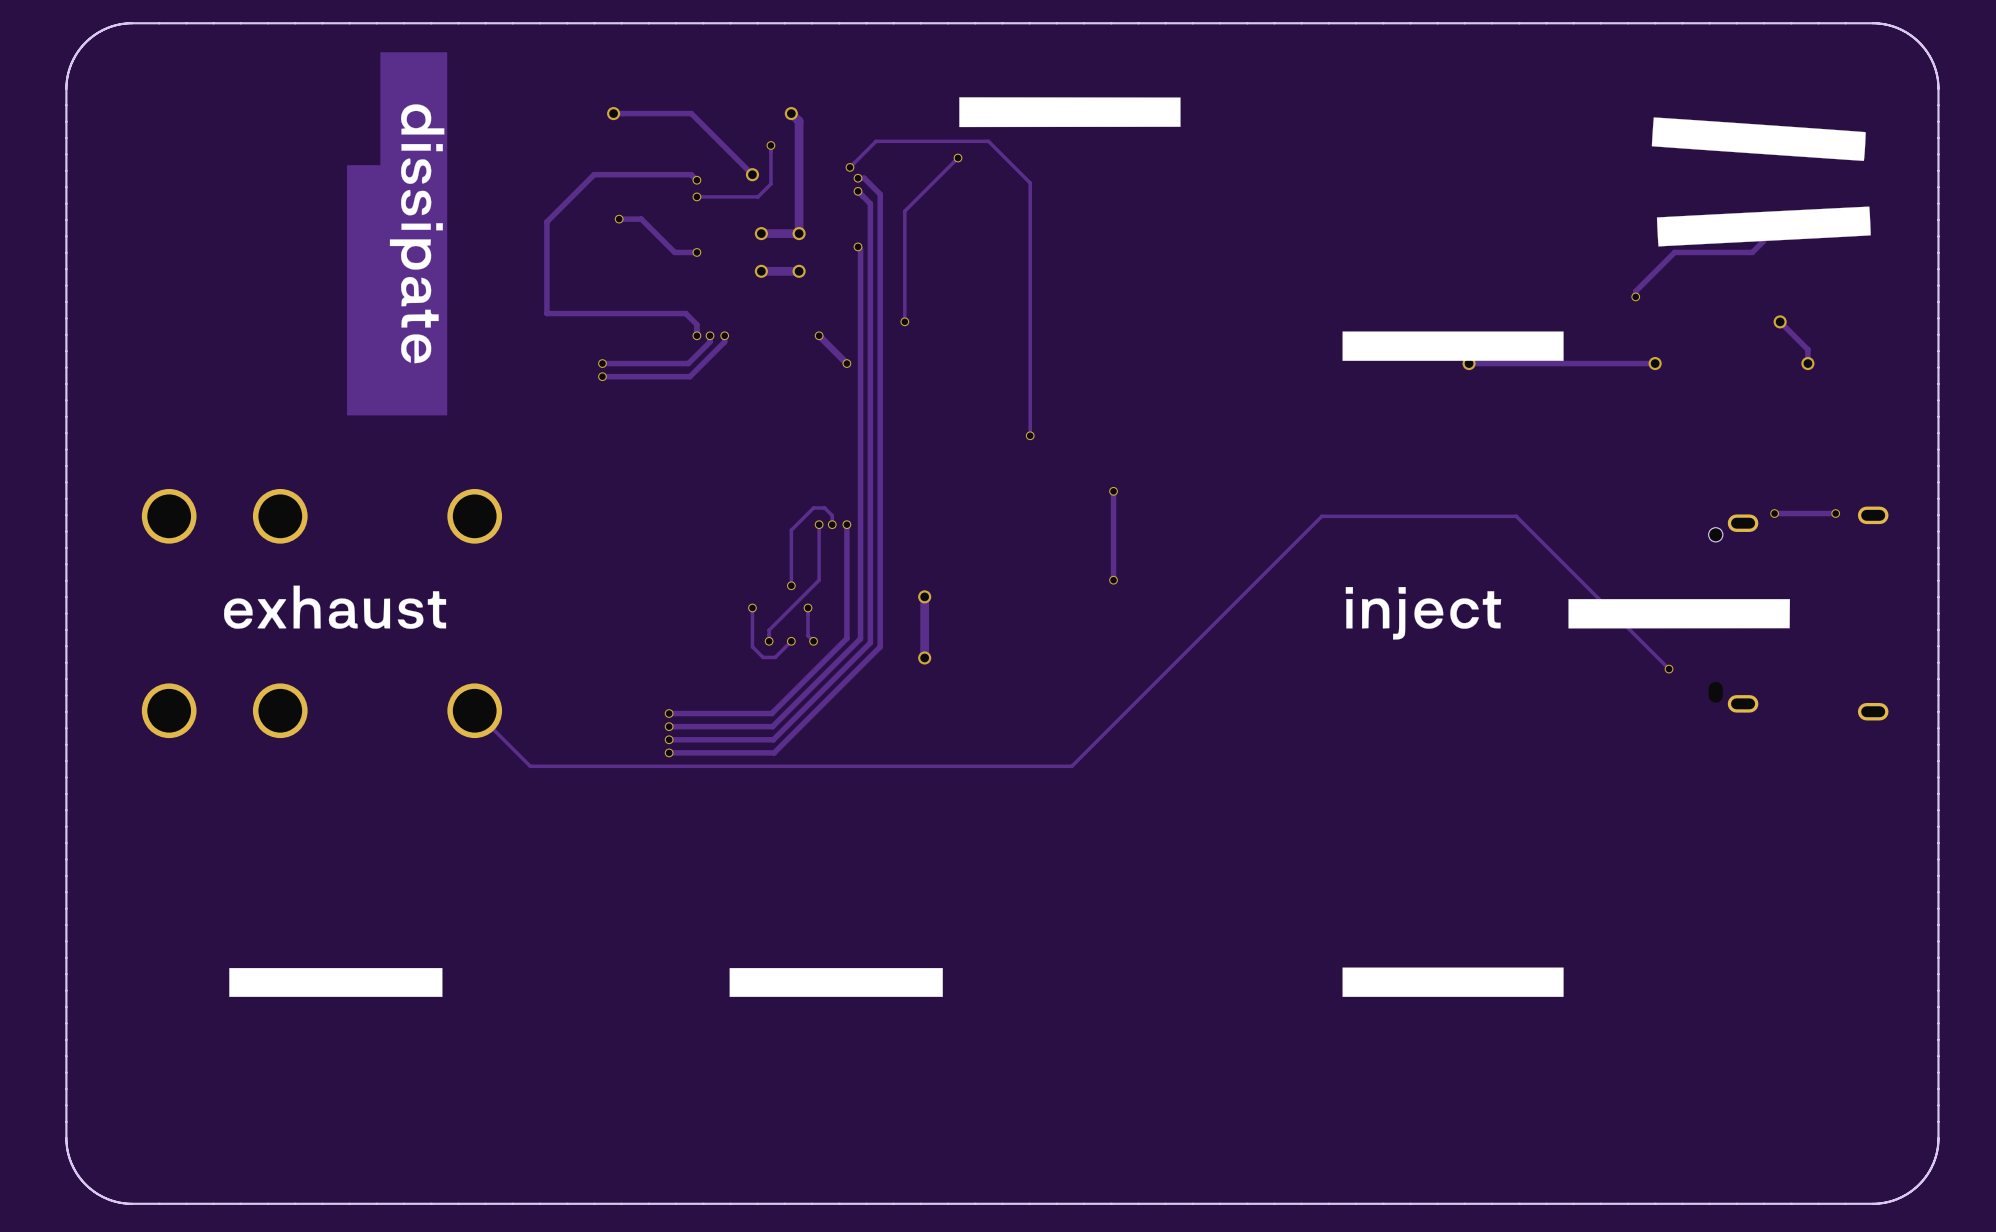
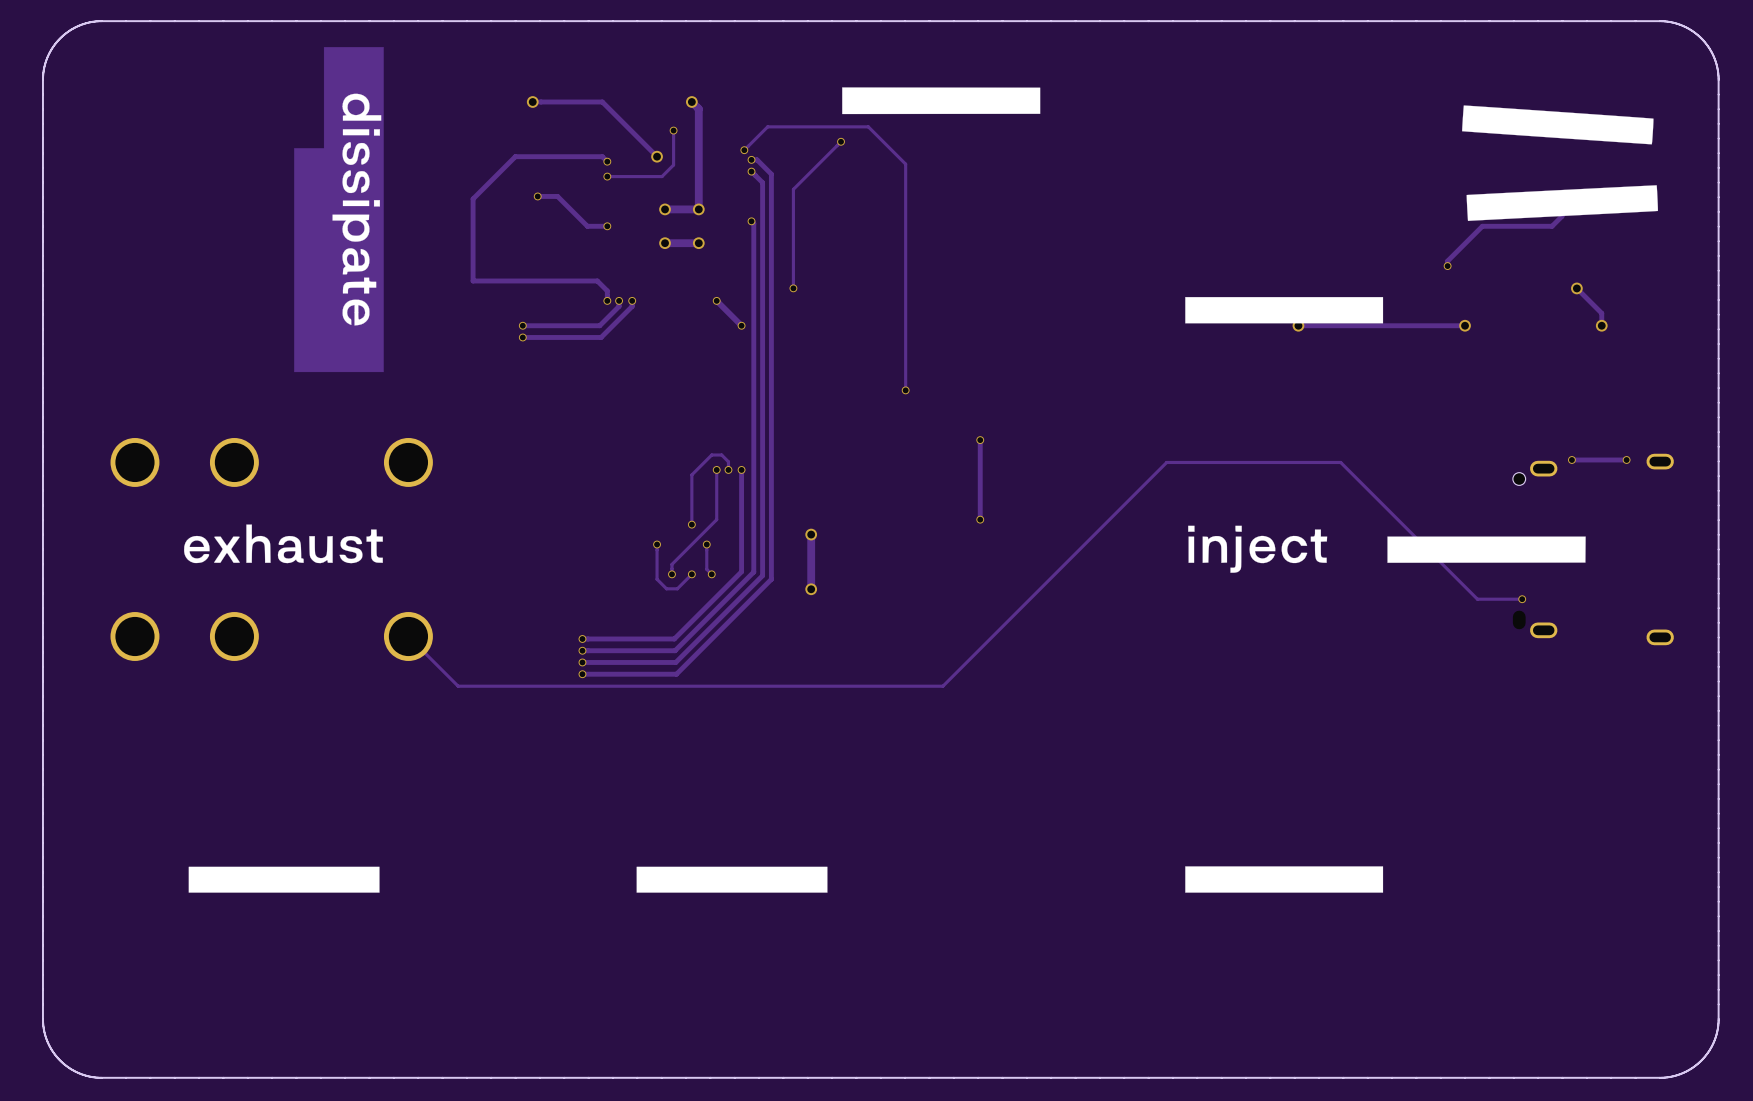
via position: (1669, 669) -> (1522, 599)
track: none -> (1522, 599) (1477, 599)

